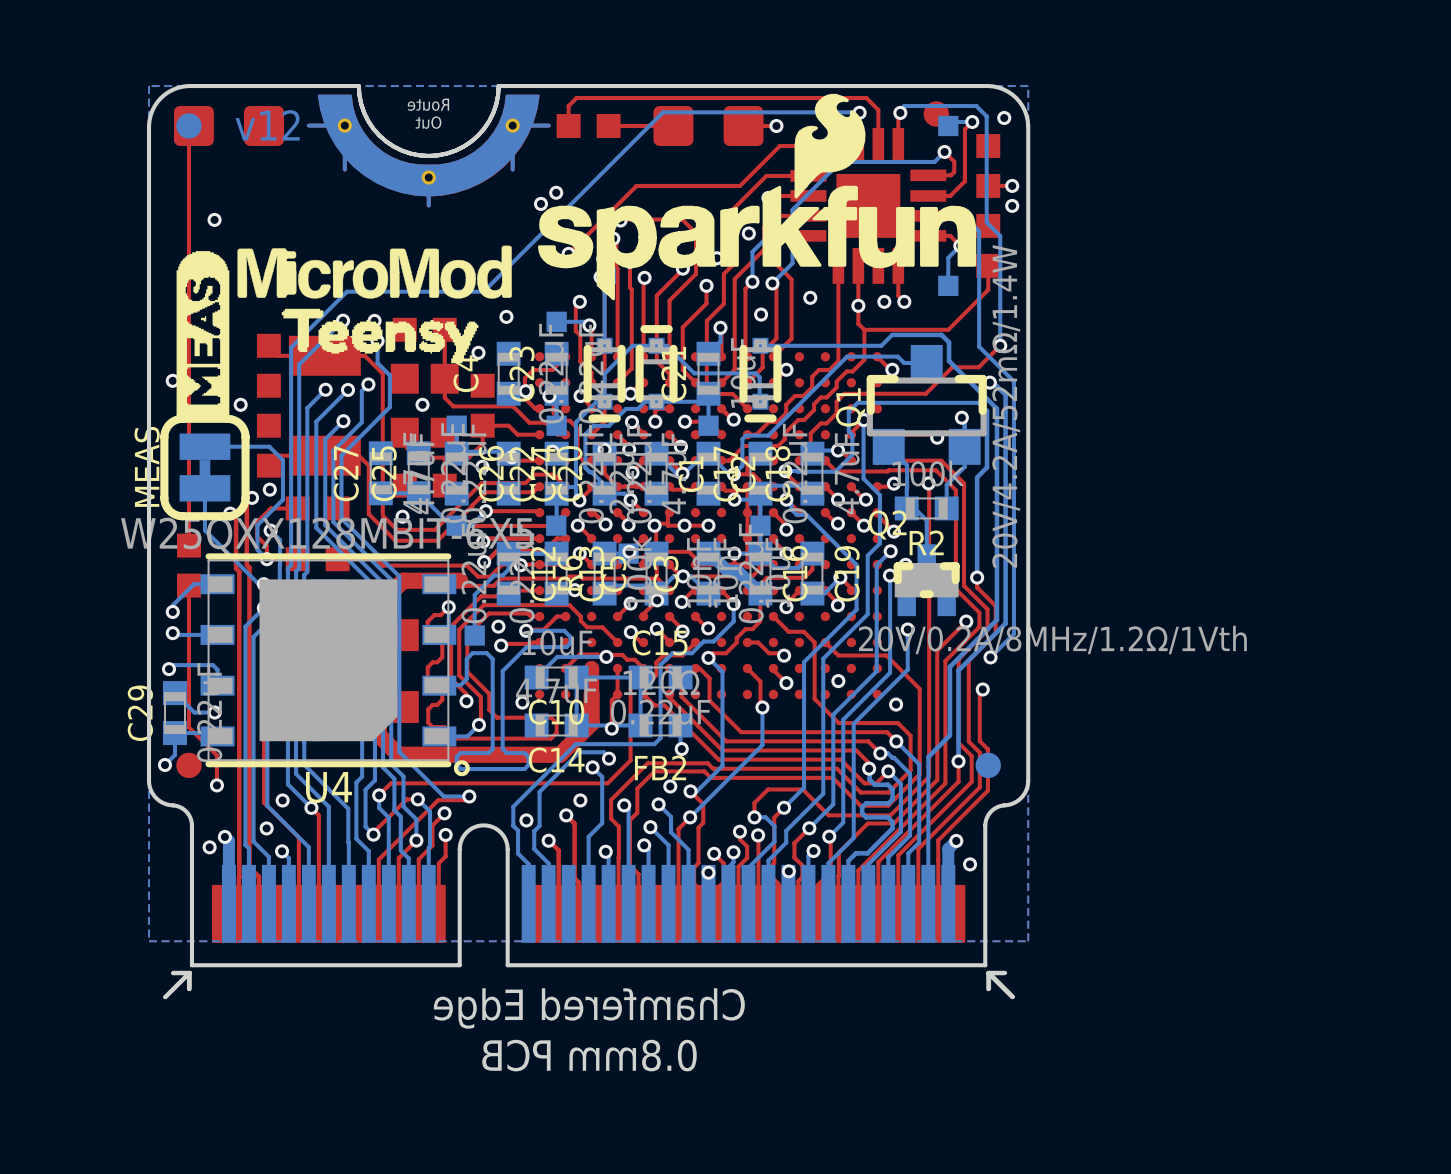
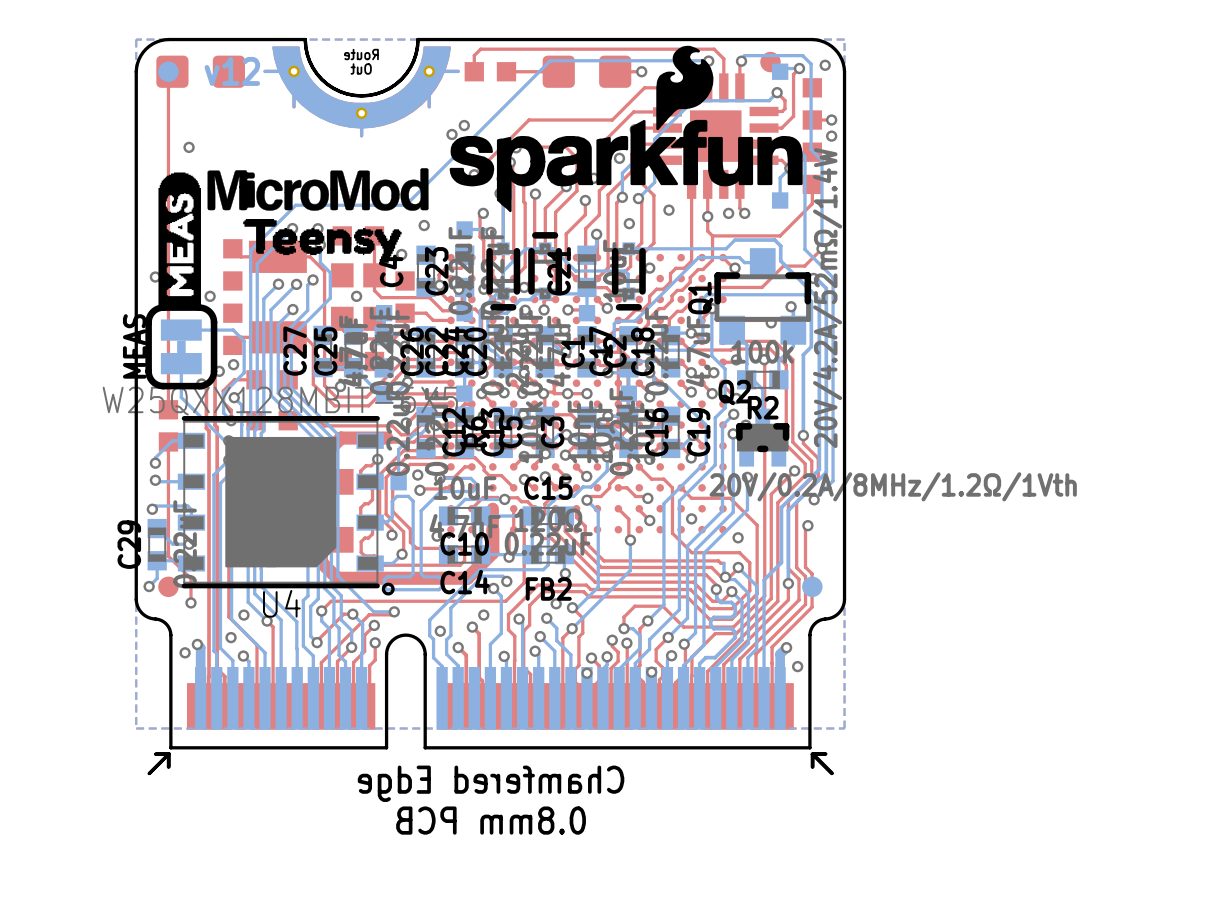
top track: (695, 668) (699, 668) (709, 678) (709, 700) (741, 732) (887, 732) (896, 741) -> (576, 508) (576, 517) (585, 526) (585, 542) (603, 560) (718, 560) (724, 563)
top track: (863, 741) (868, 741) (880, 753) -> (711, 567) (721, 577) (729, 577) (737, 569)
bottom track: (880, 753) (888, 753) (910, 773) (910, 835) (888, 857) -> (724, 563) (724, 574) (729, 579) (734, 579) (748, 593) (748, 643) (731, 660)

